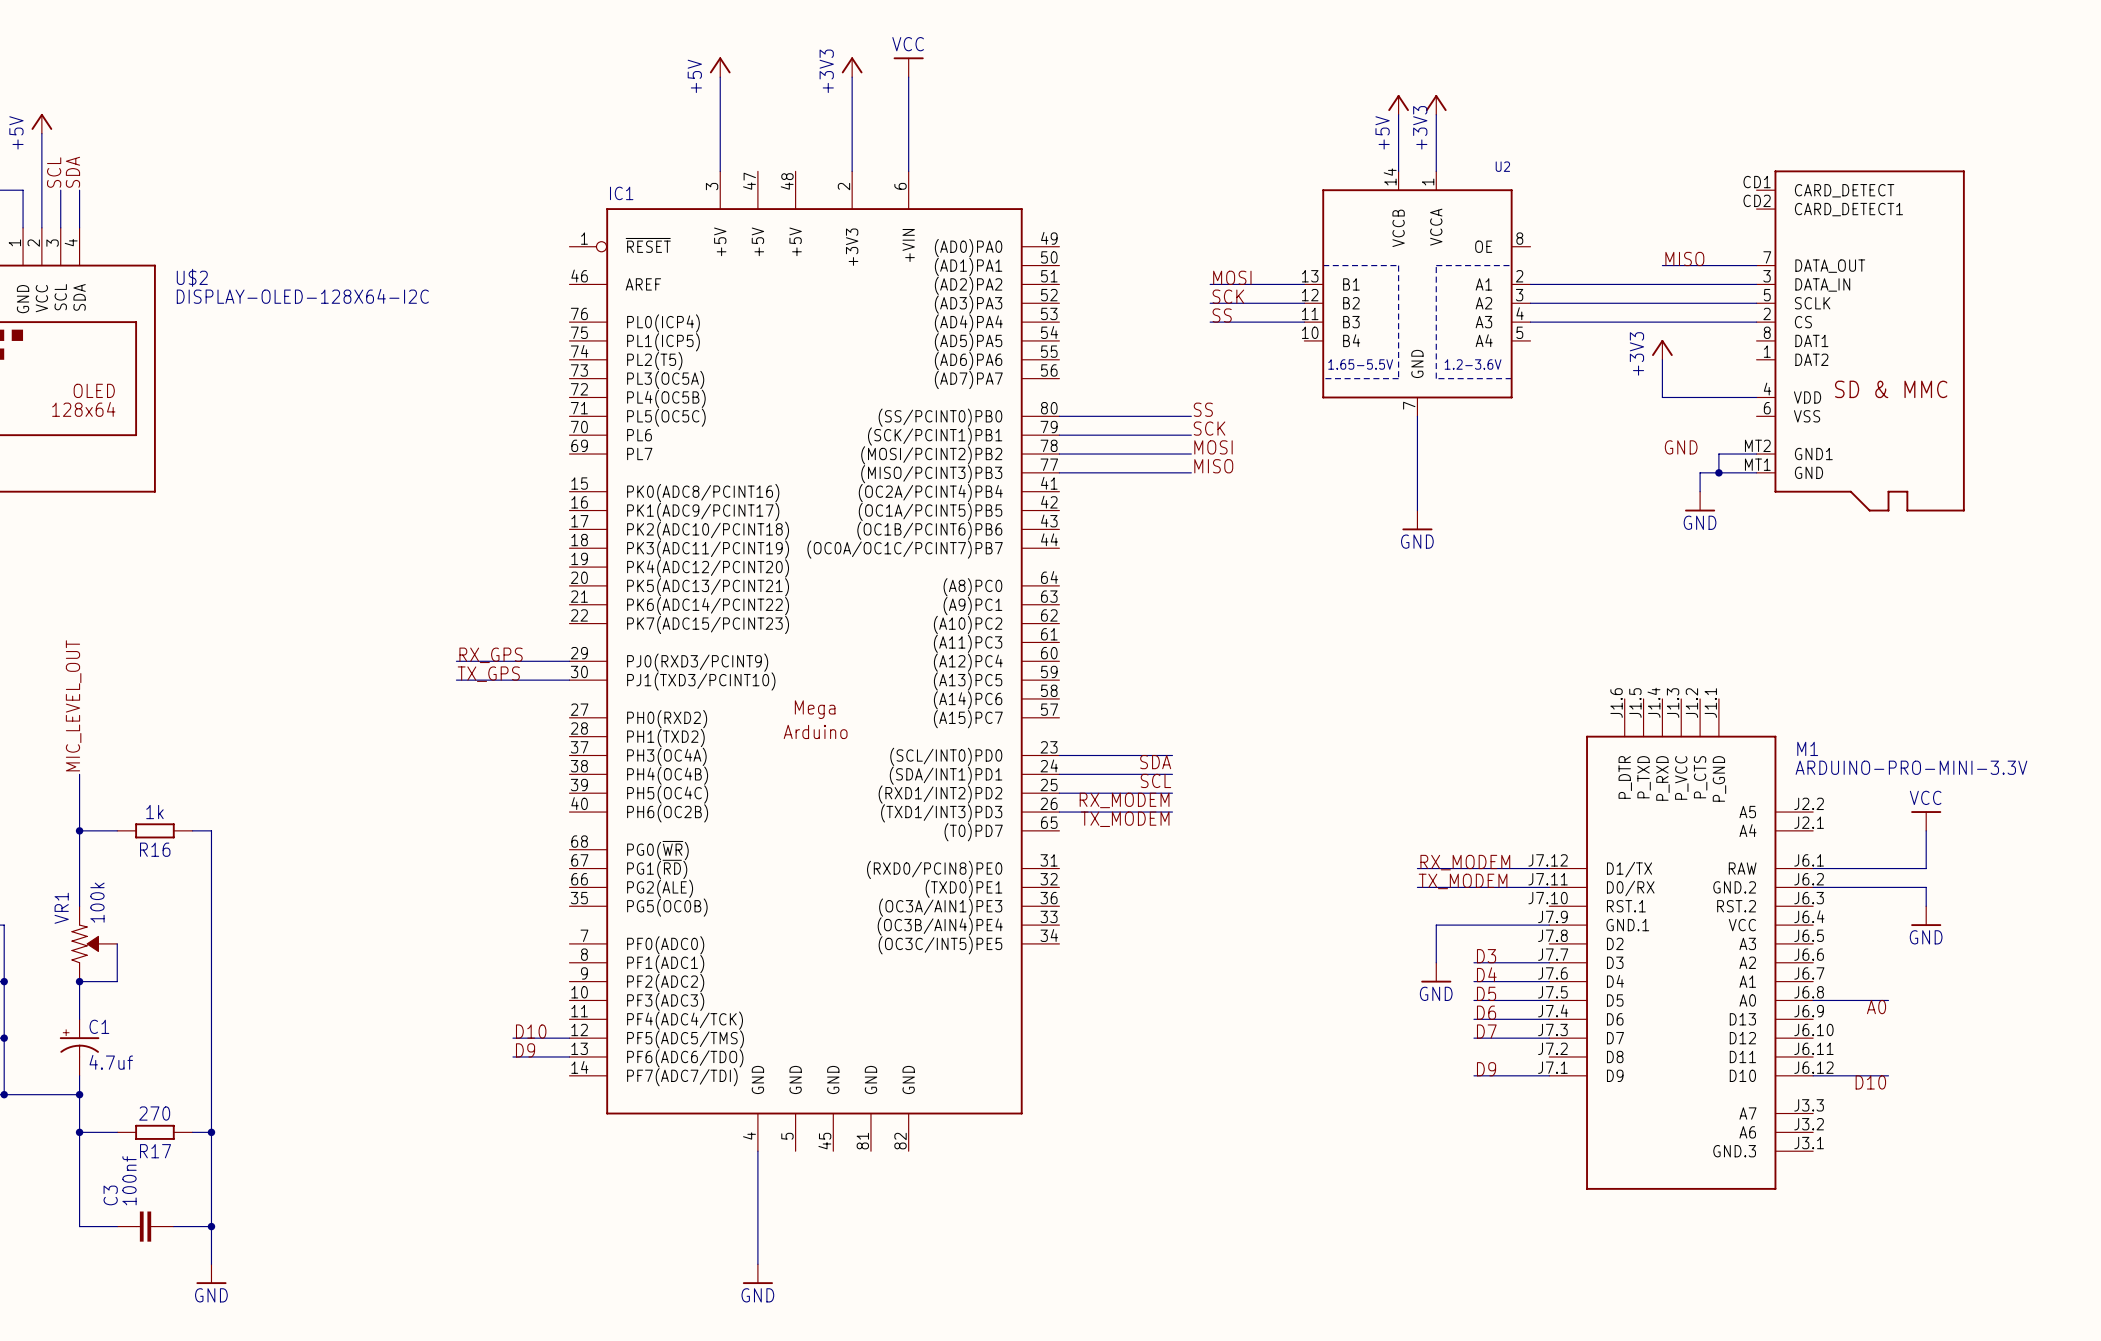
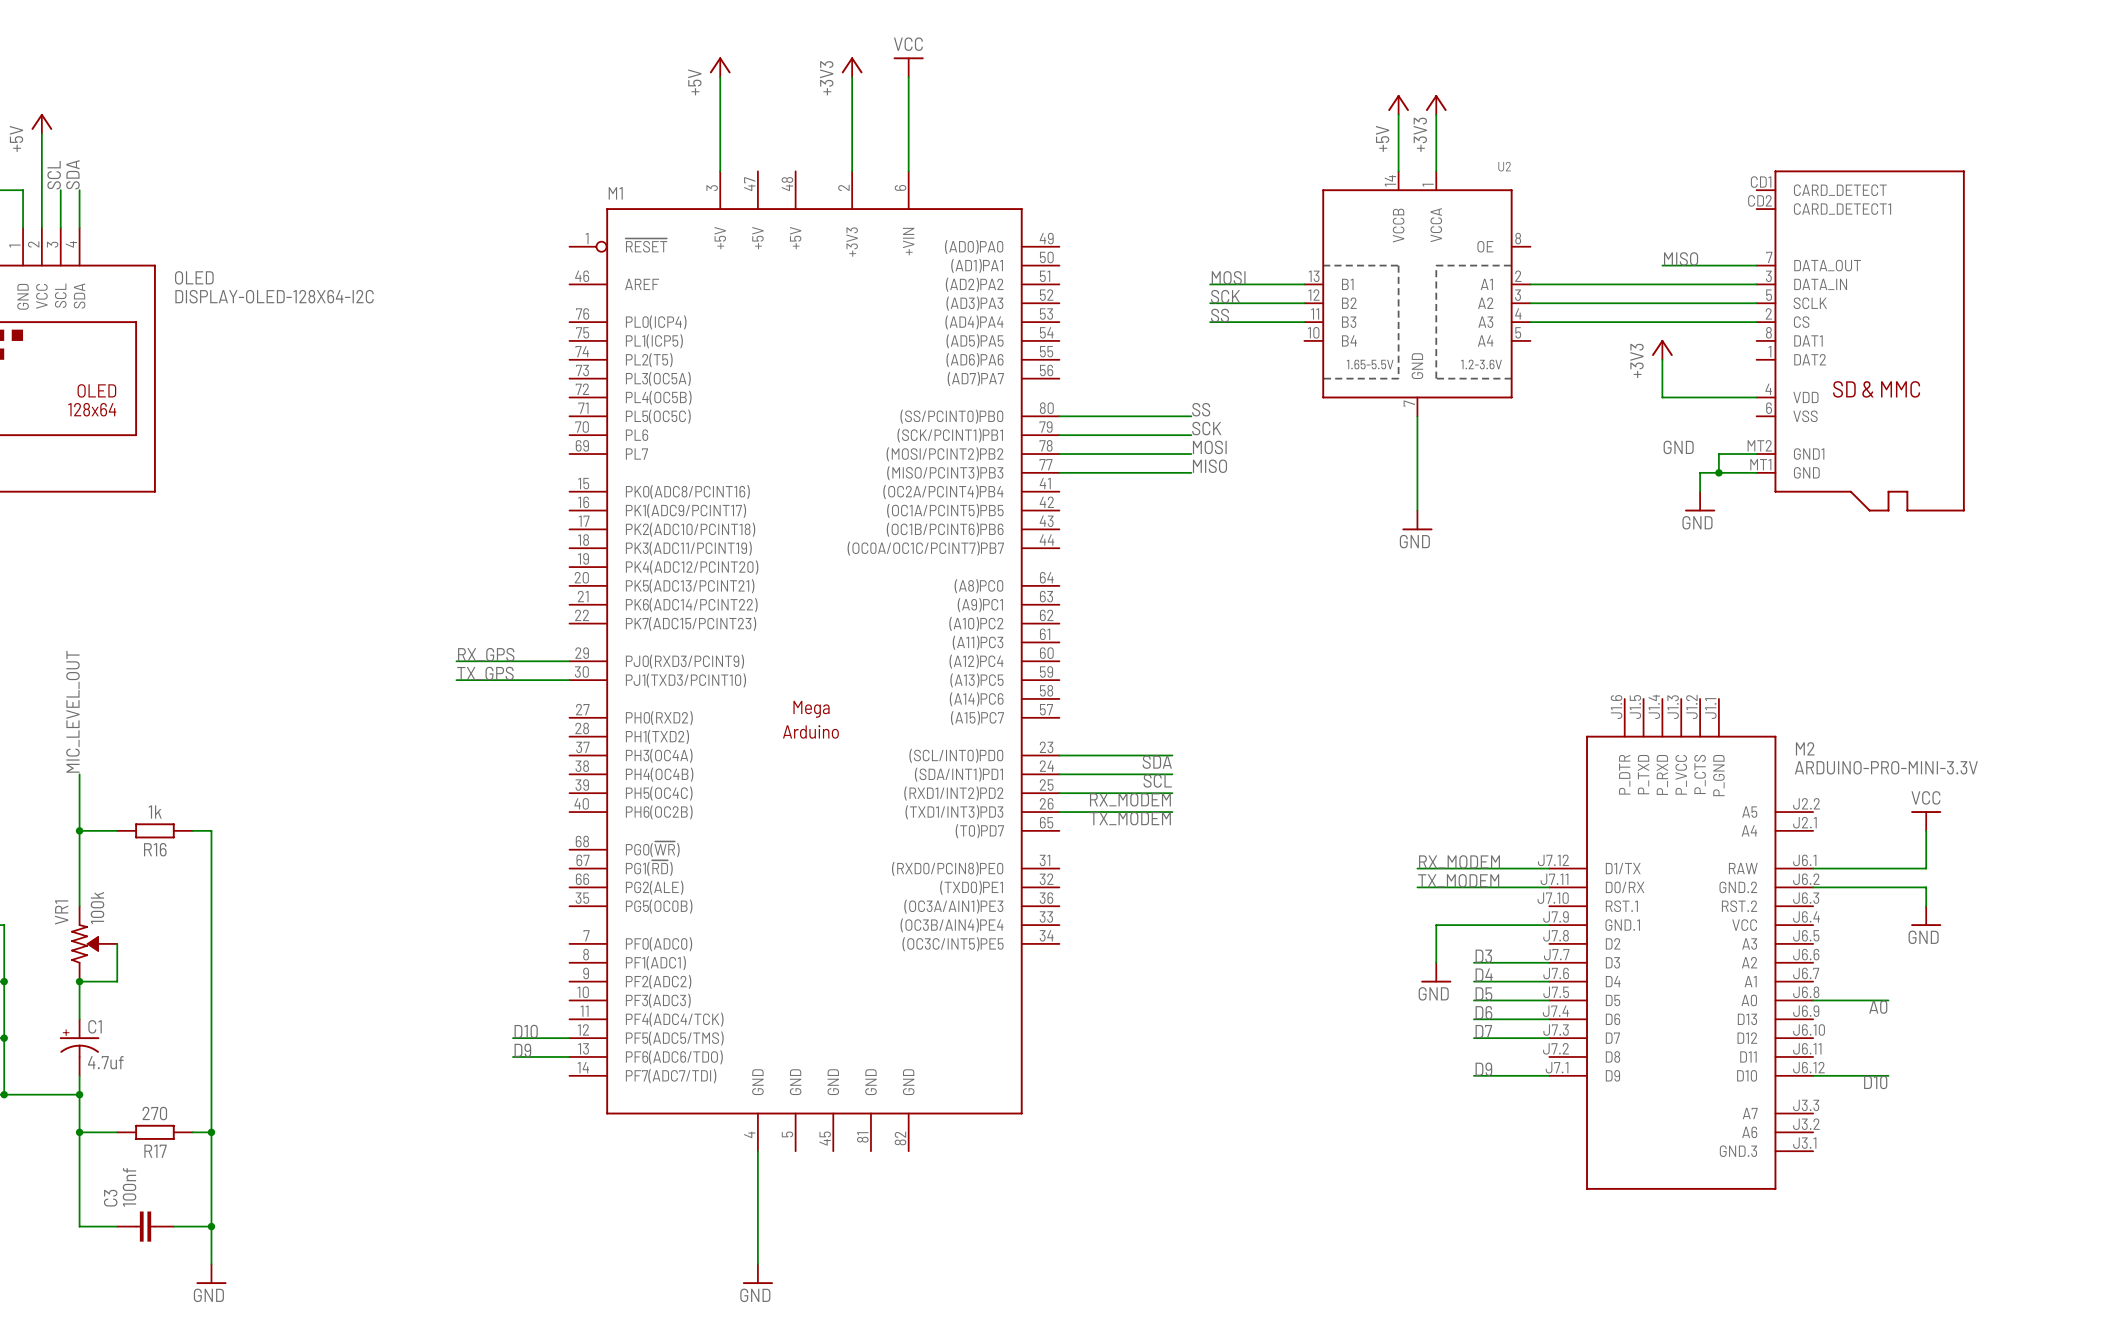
IC1 name: IC1 (621, 193) -> M1 (615, 193)
U$2 name: U$2 (192, 277) -> OLED (194, 277)
M1 name: M1 (1807, 748) -> M2 (1805, 748)

